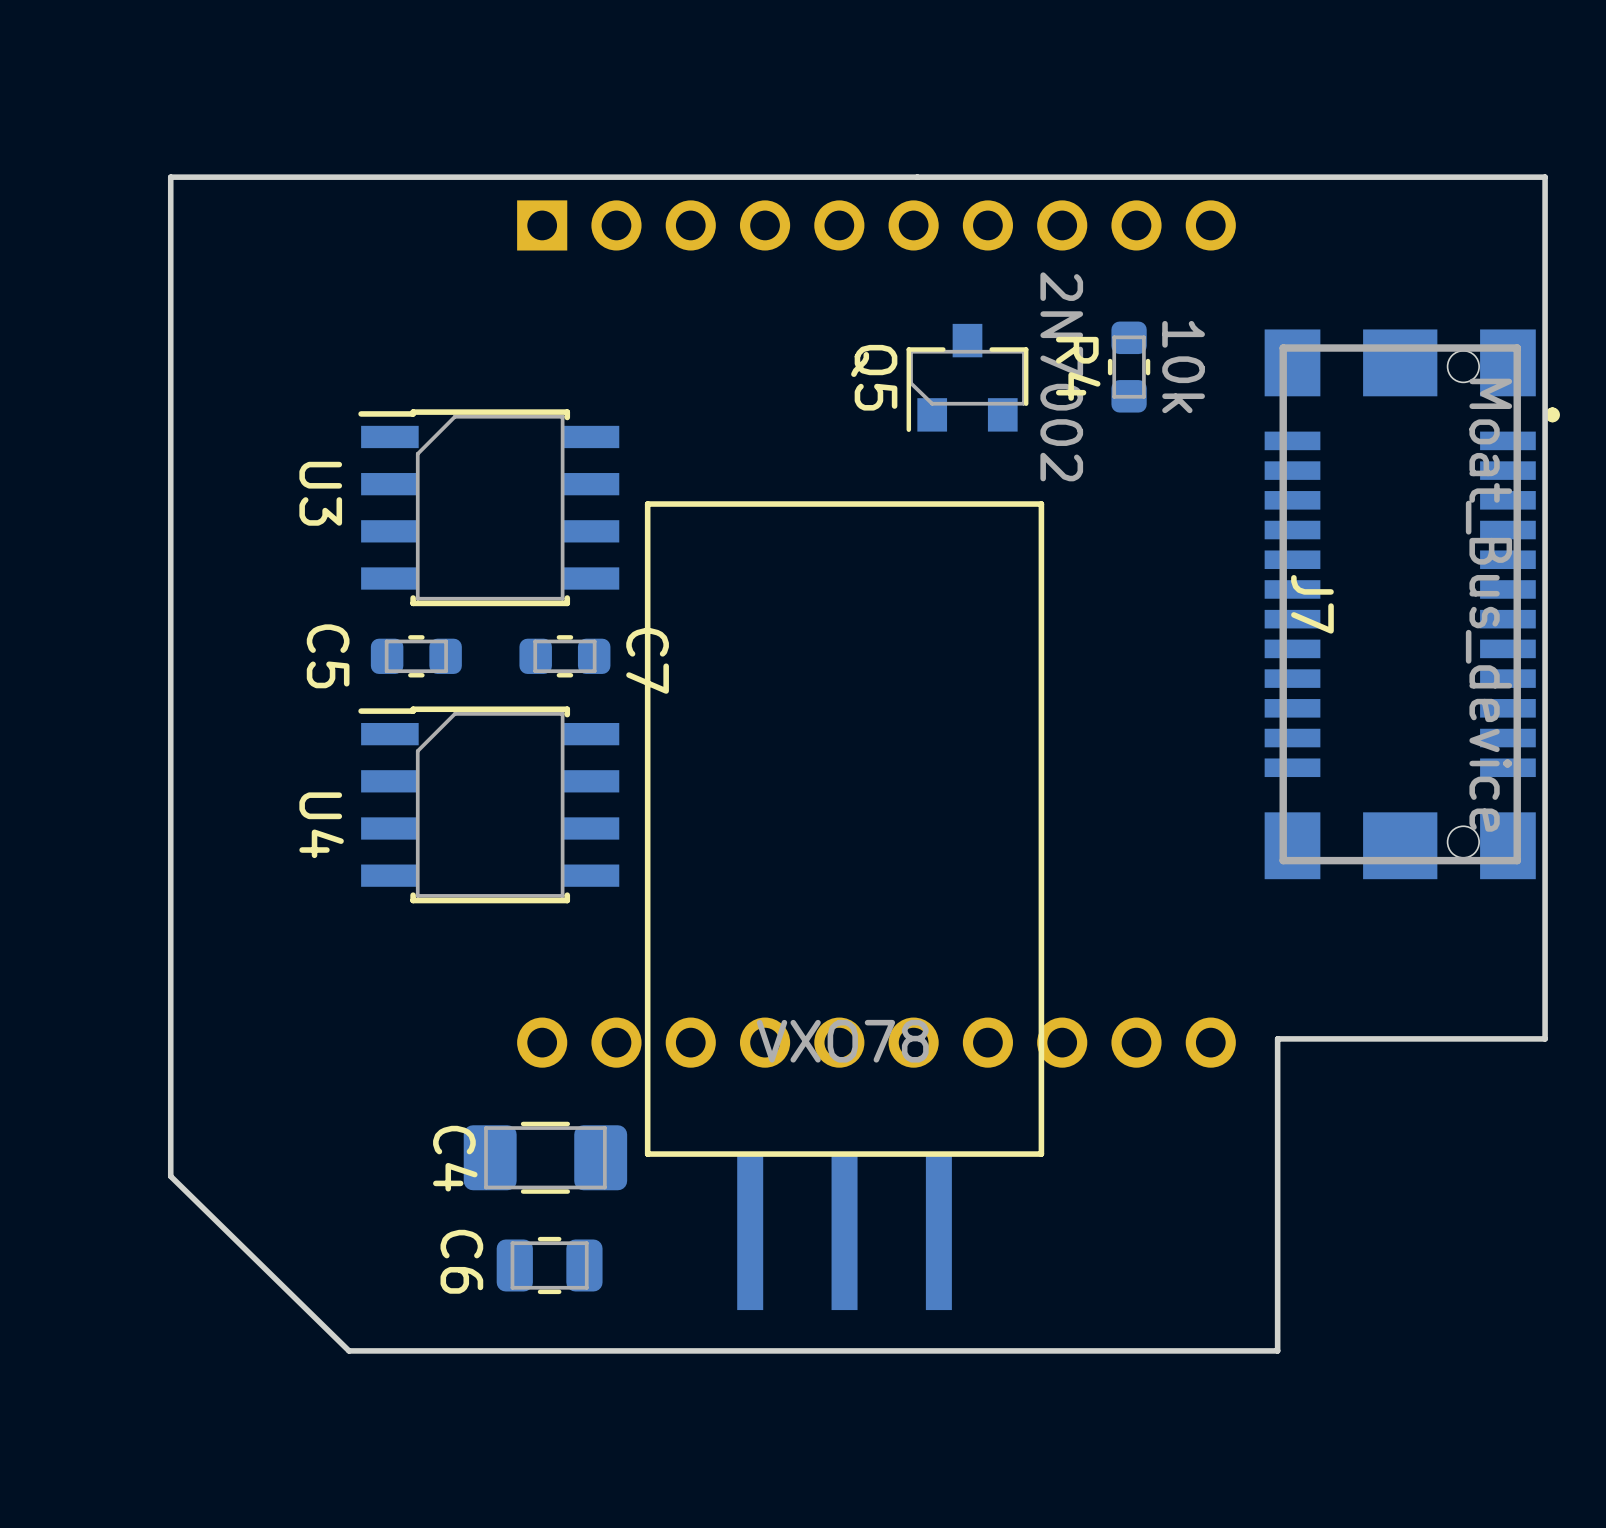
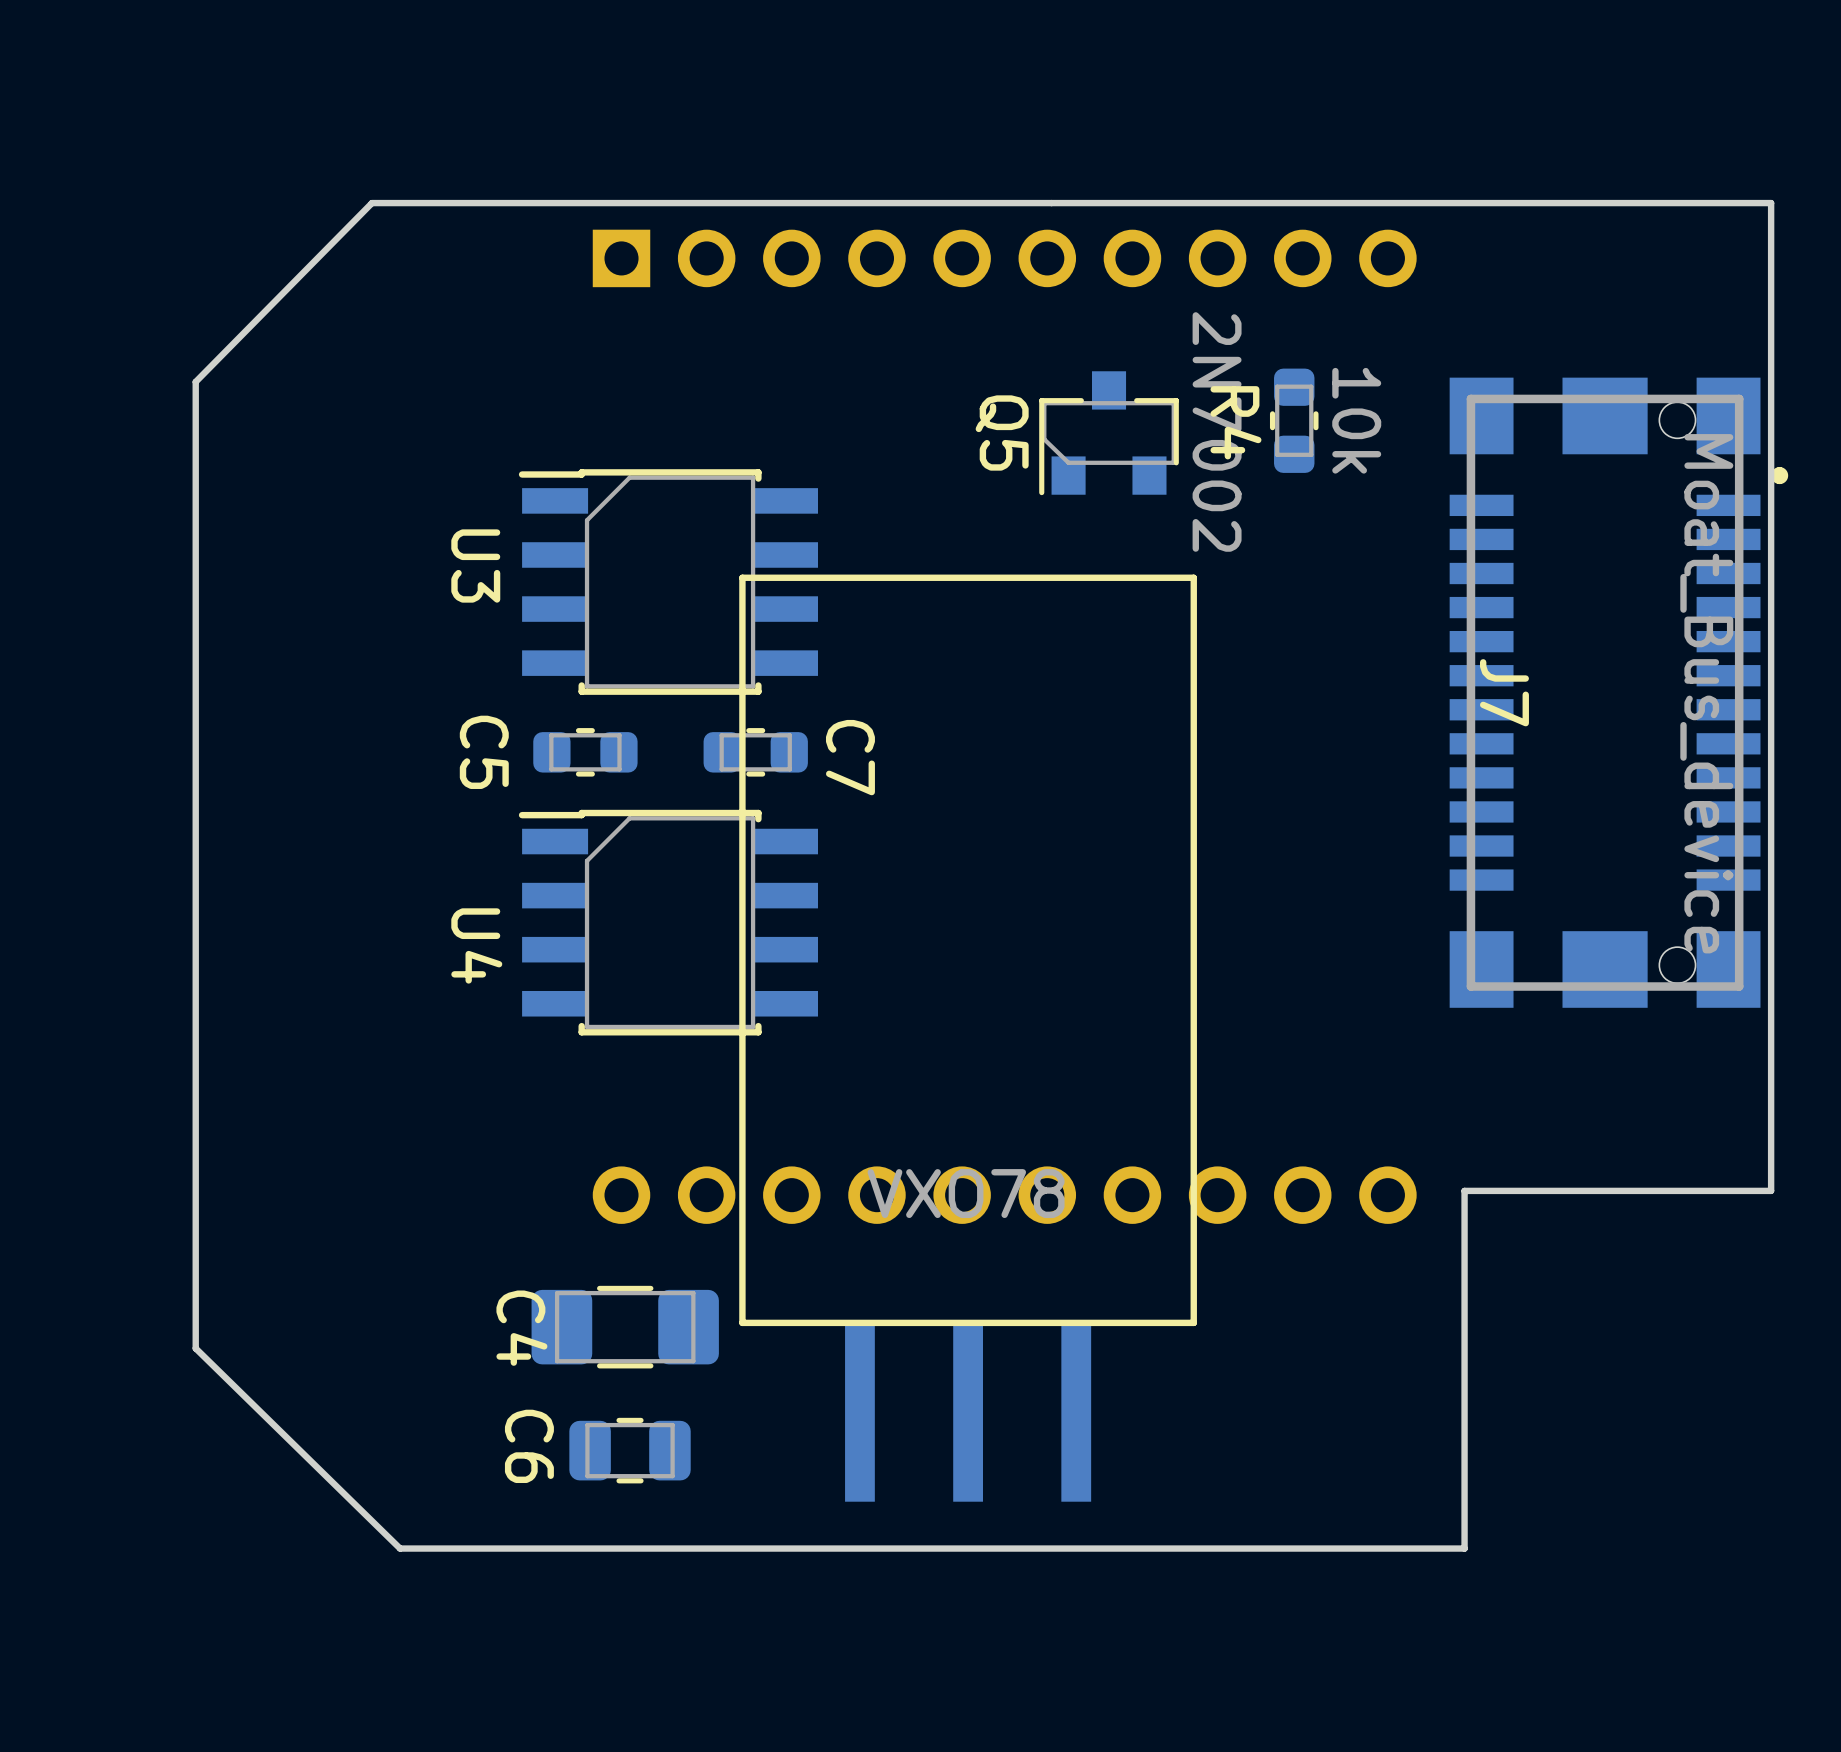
board edge: (324, 177) (170, 177) (170, 333) -> (371, 203) (195, 381)
U3 position: (488, 507) -> (668, 582)
C5 position: (416, 656) -> (585, 752)
C7 position: (564, 656) -> (755, 752)
U4 position: (488, 804) -> (668, 922)

